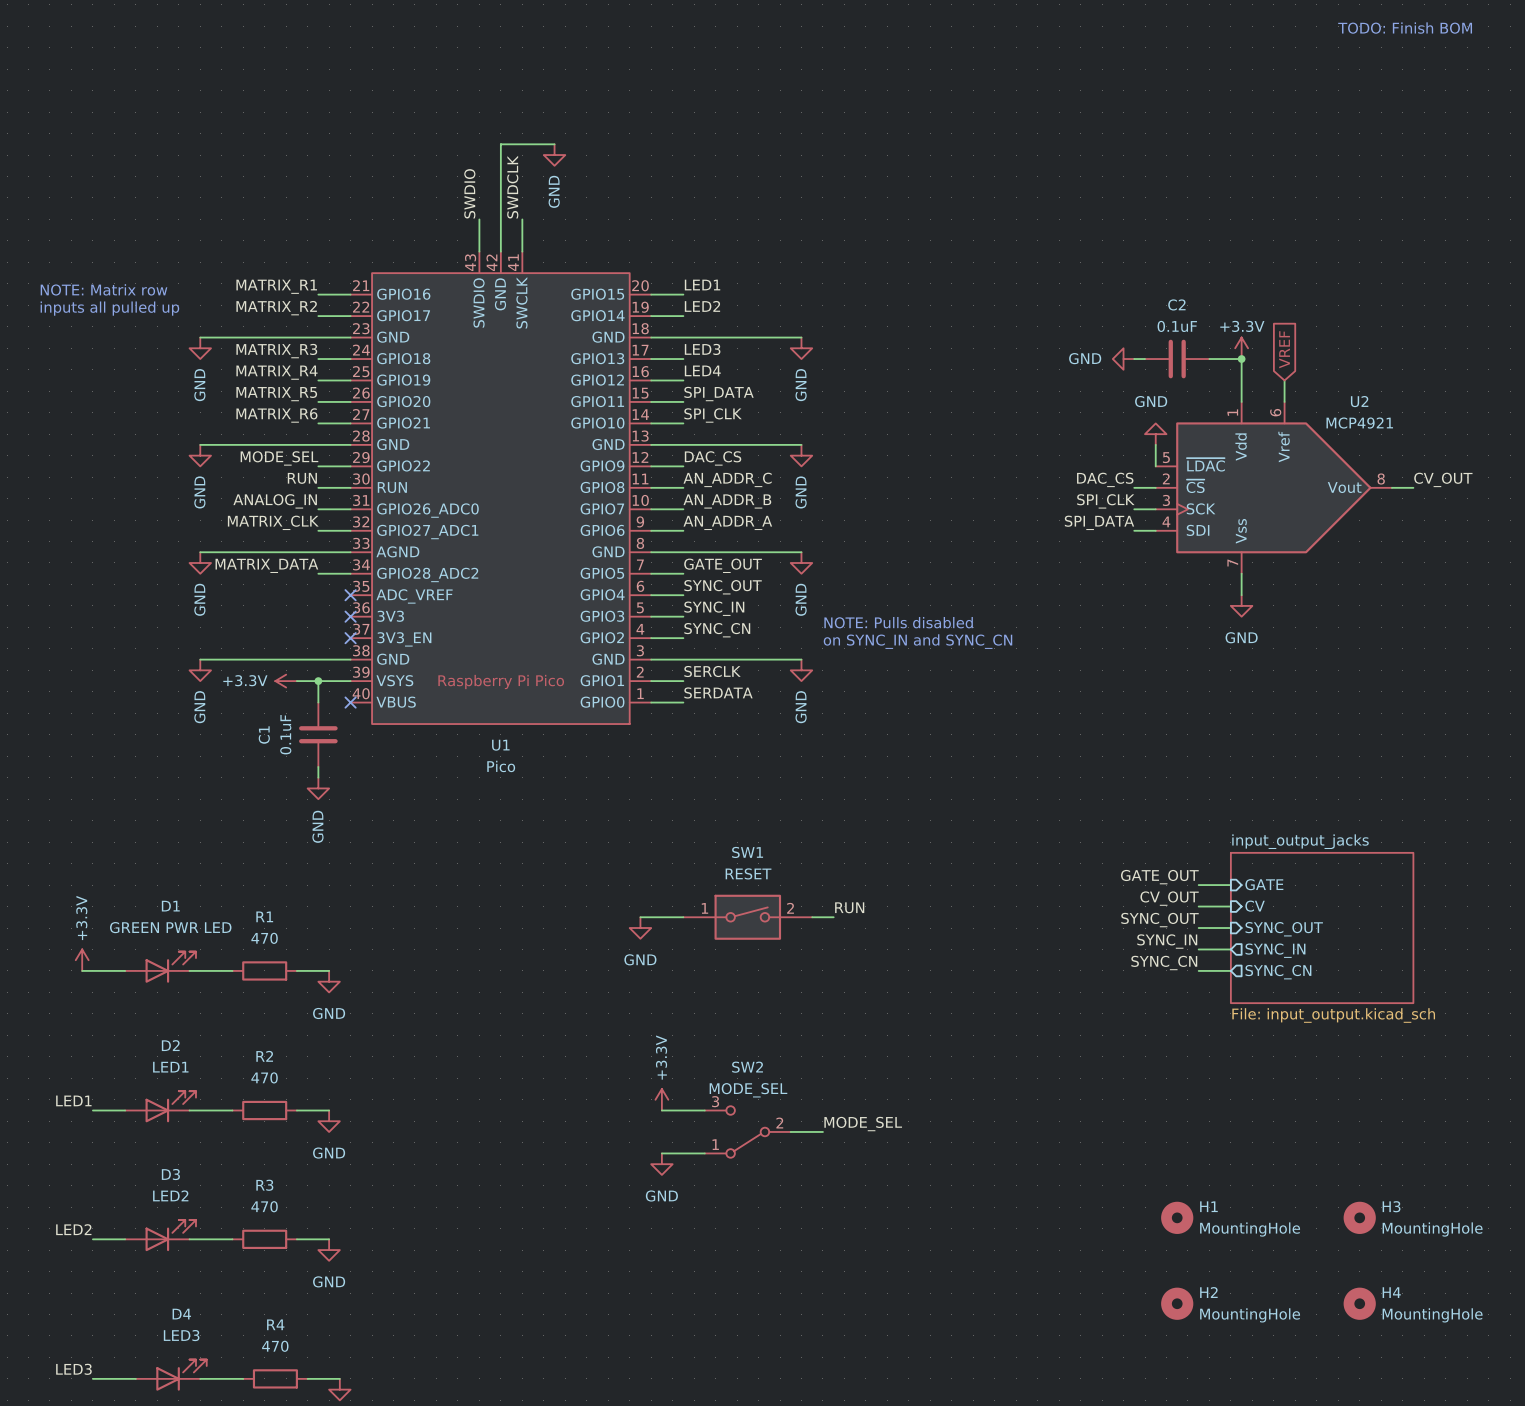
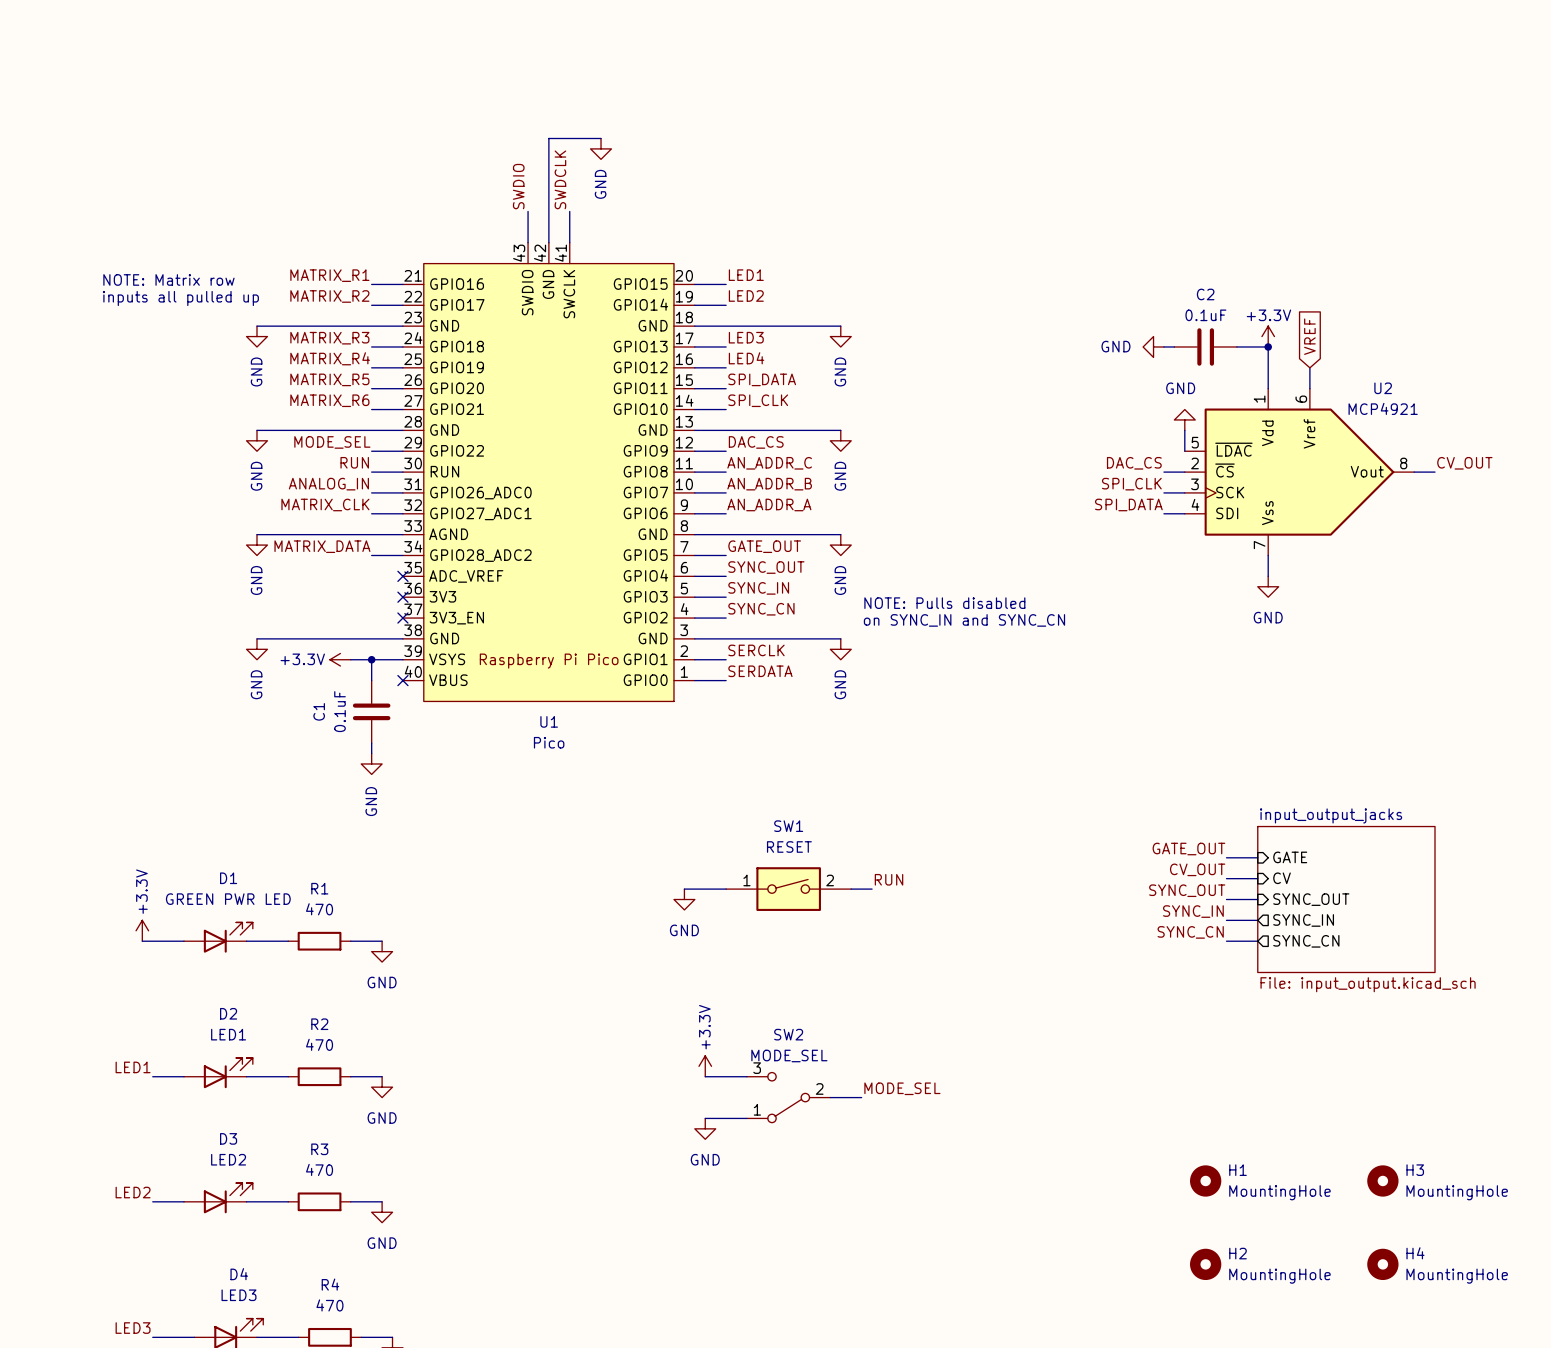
text: TODO: Finish BOM (1405, 28) -> none

